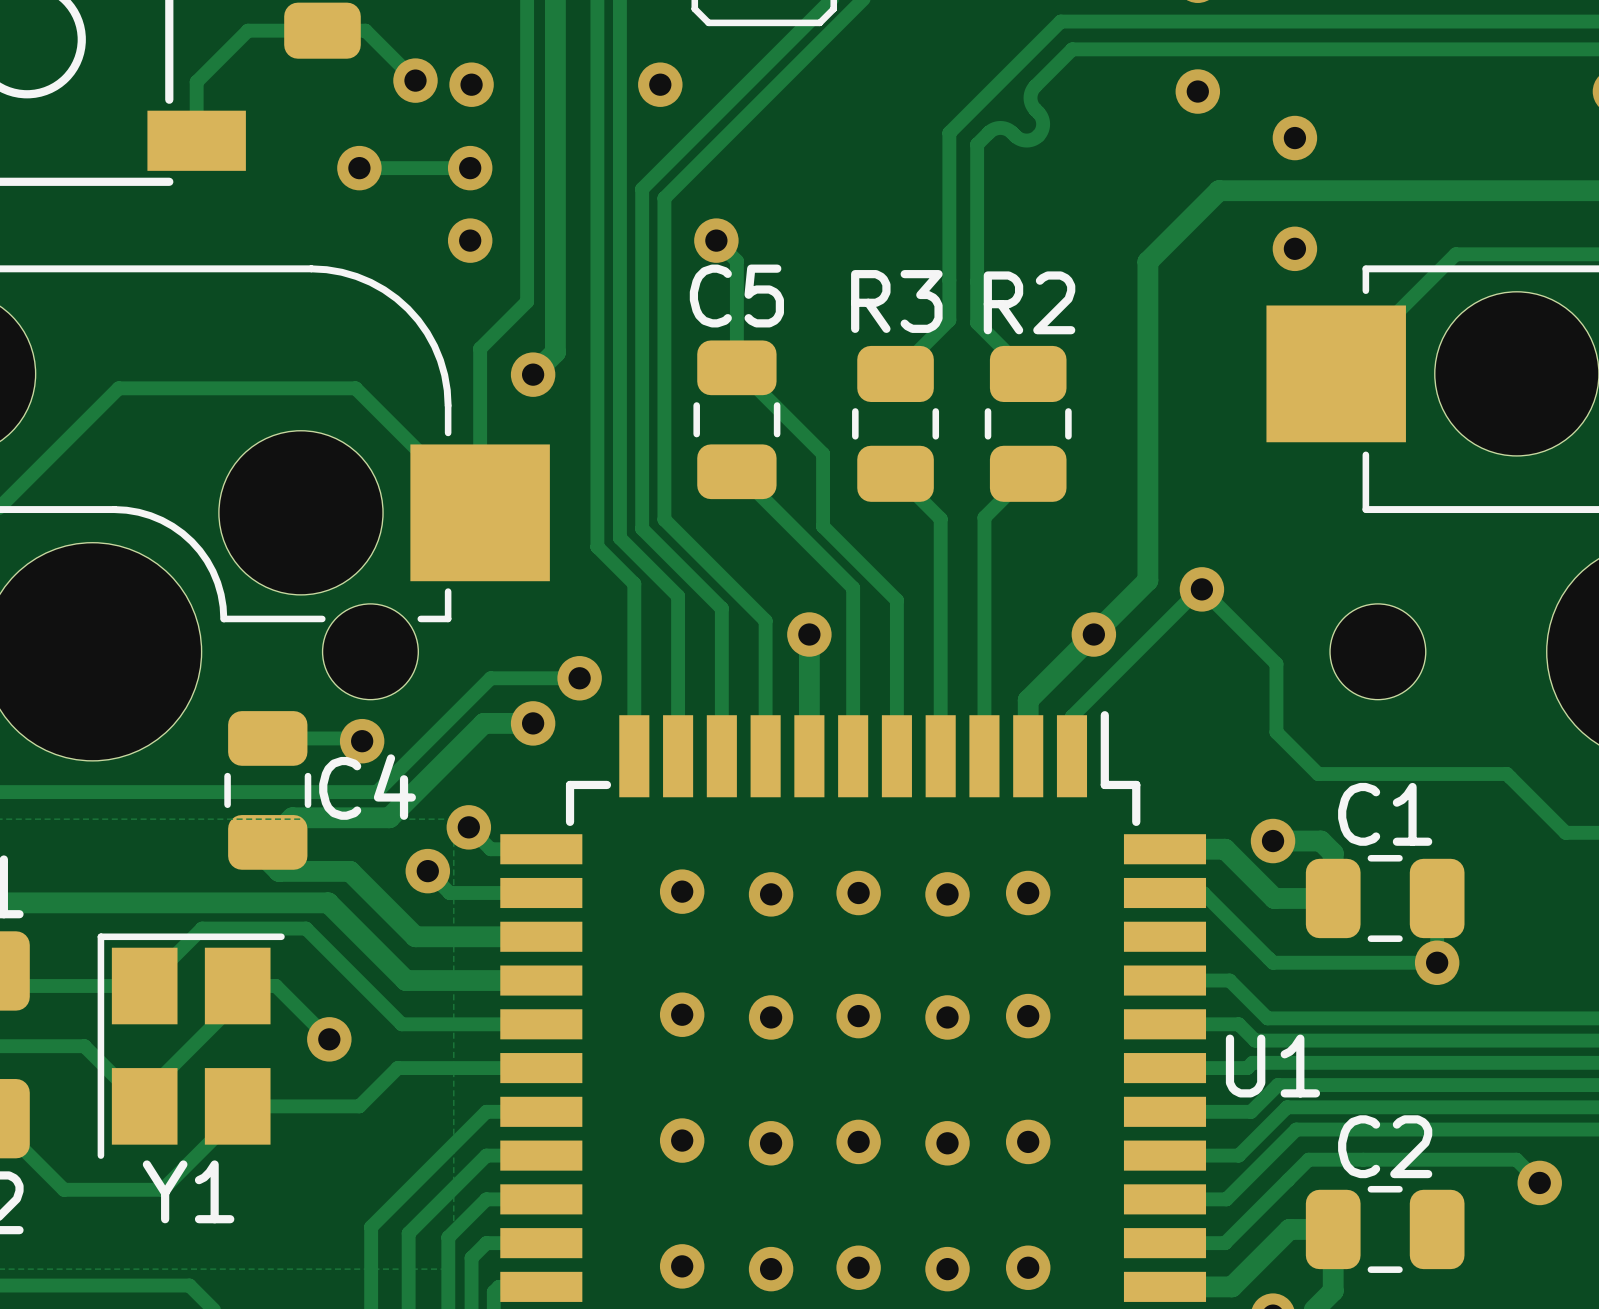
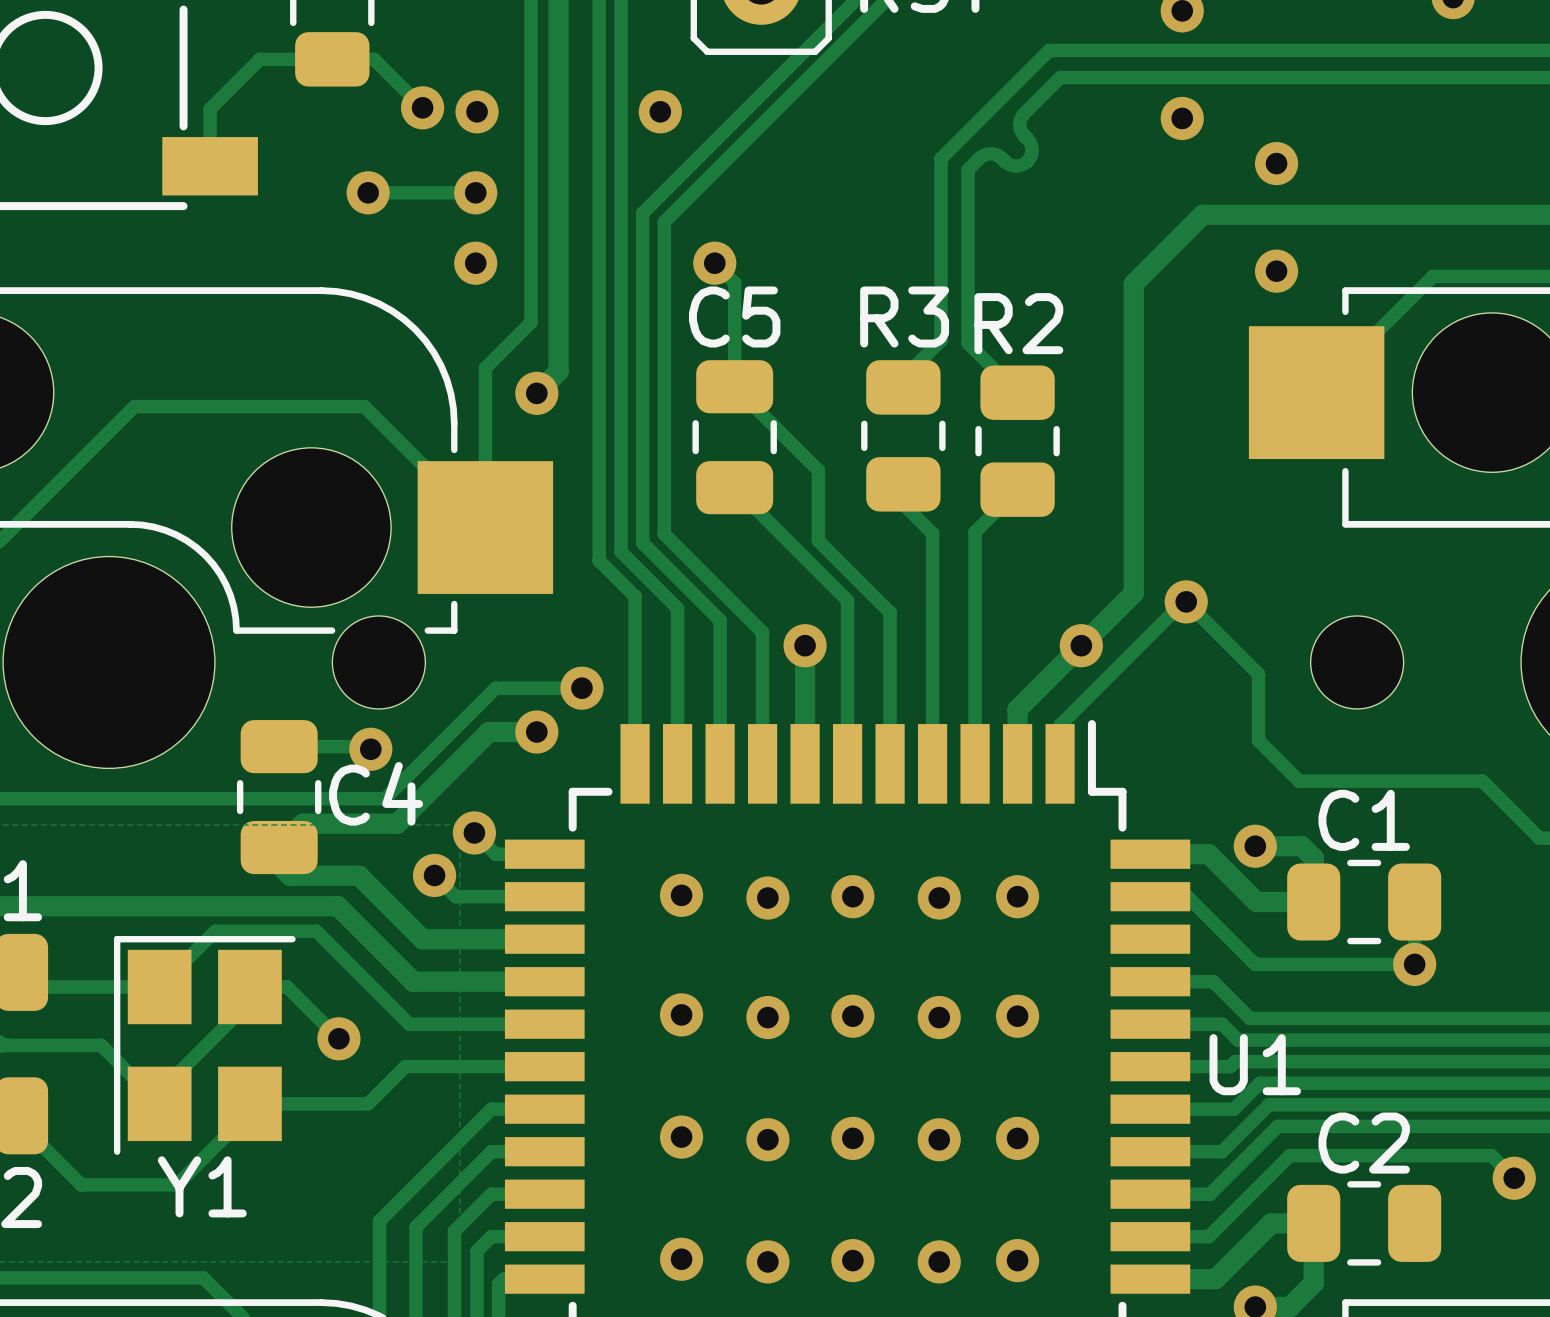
R3 position: (895, 423) -> (903, 435)

